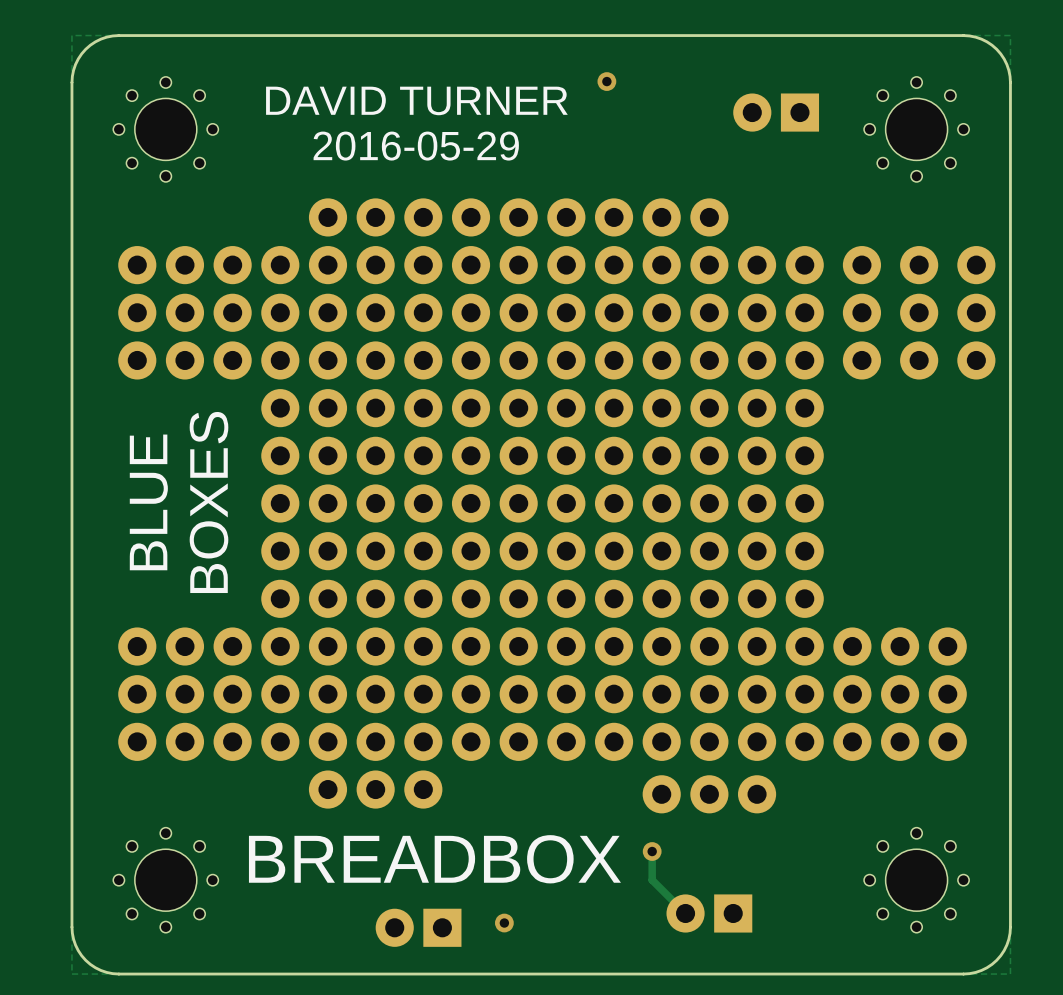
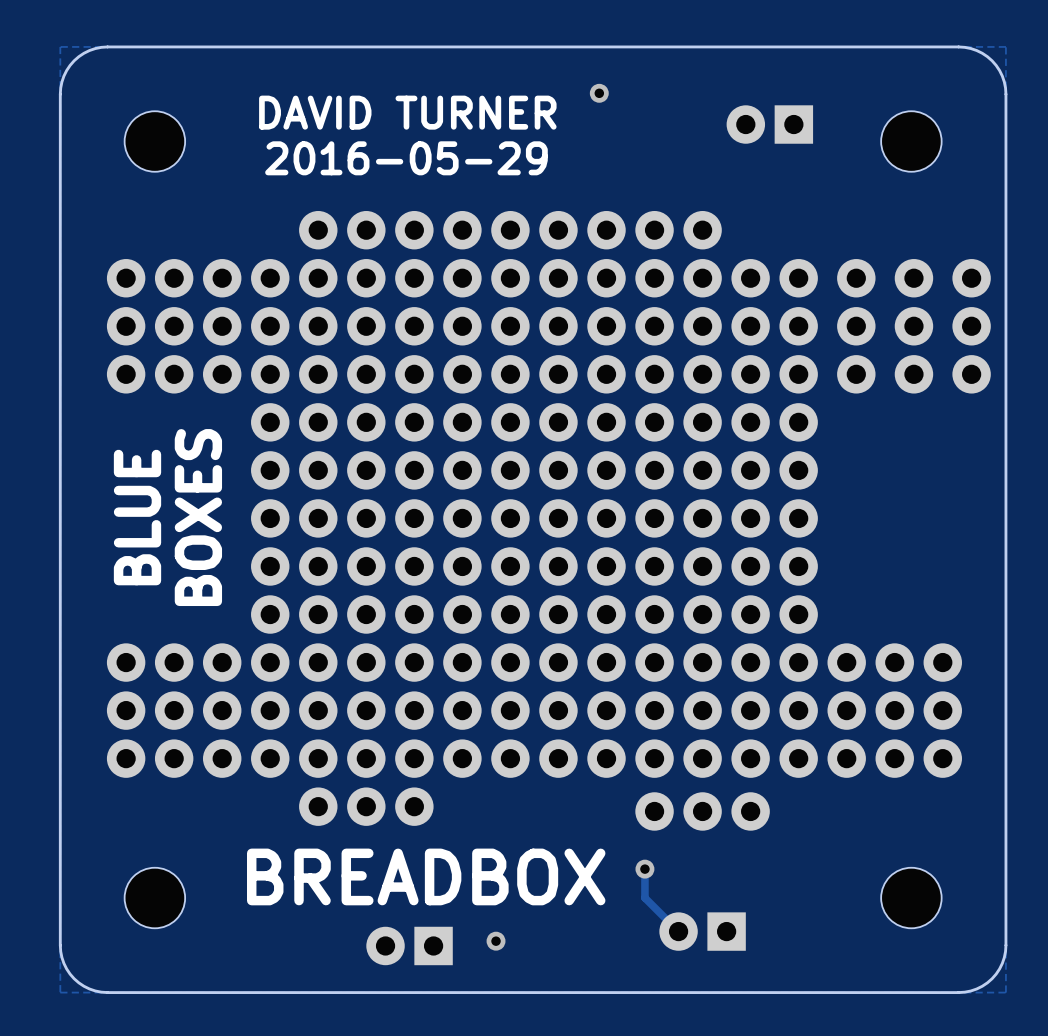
part footprint: [113, 76, 219, 182] -> [124, 111, 186, 172]
part footprint: [864, 76, 970, 182] -> [881, 111, 942, 172]
part footprint: [113, 827, 219, 933] -> [124, 867, 186, 929]
part footprint: [864, 827, 970, 933] -> [881, 867, 942, 929]

